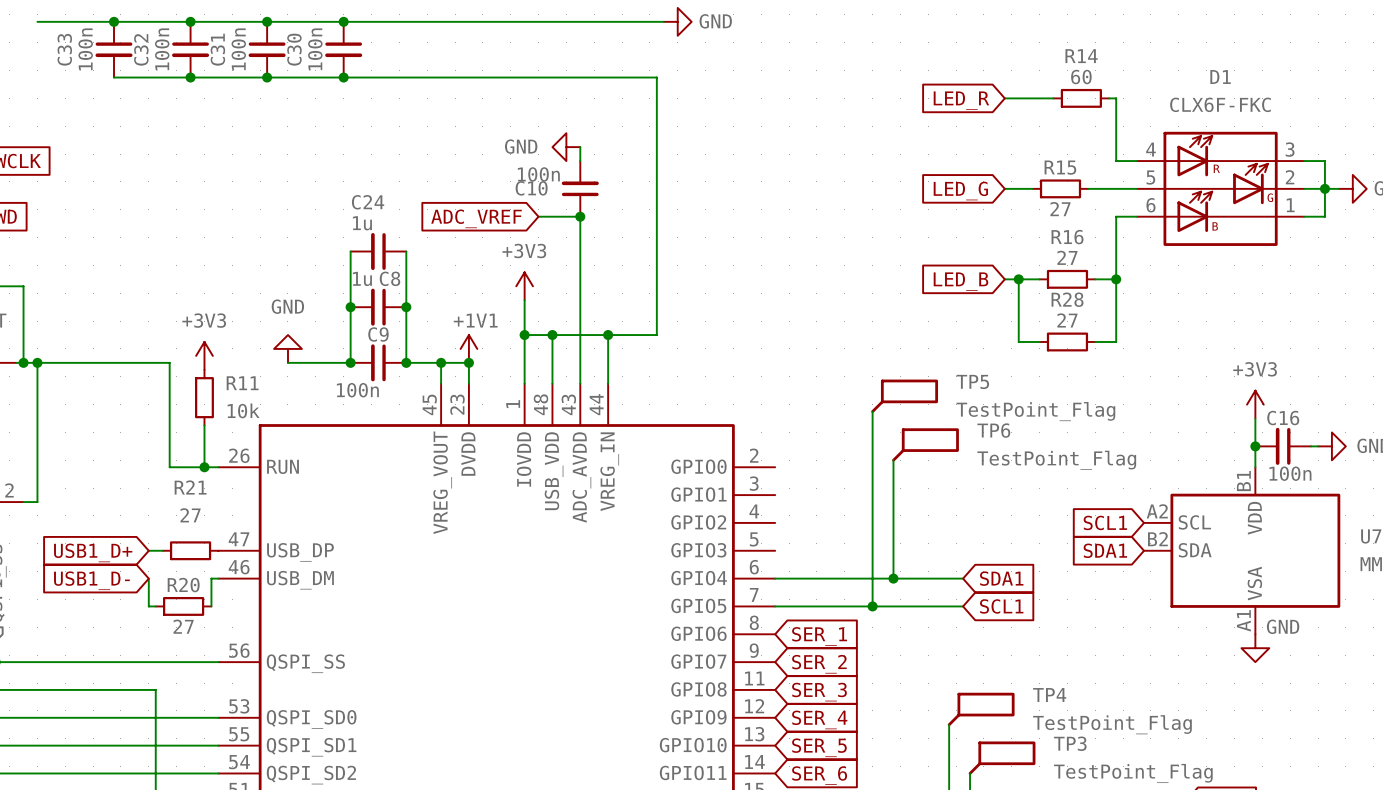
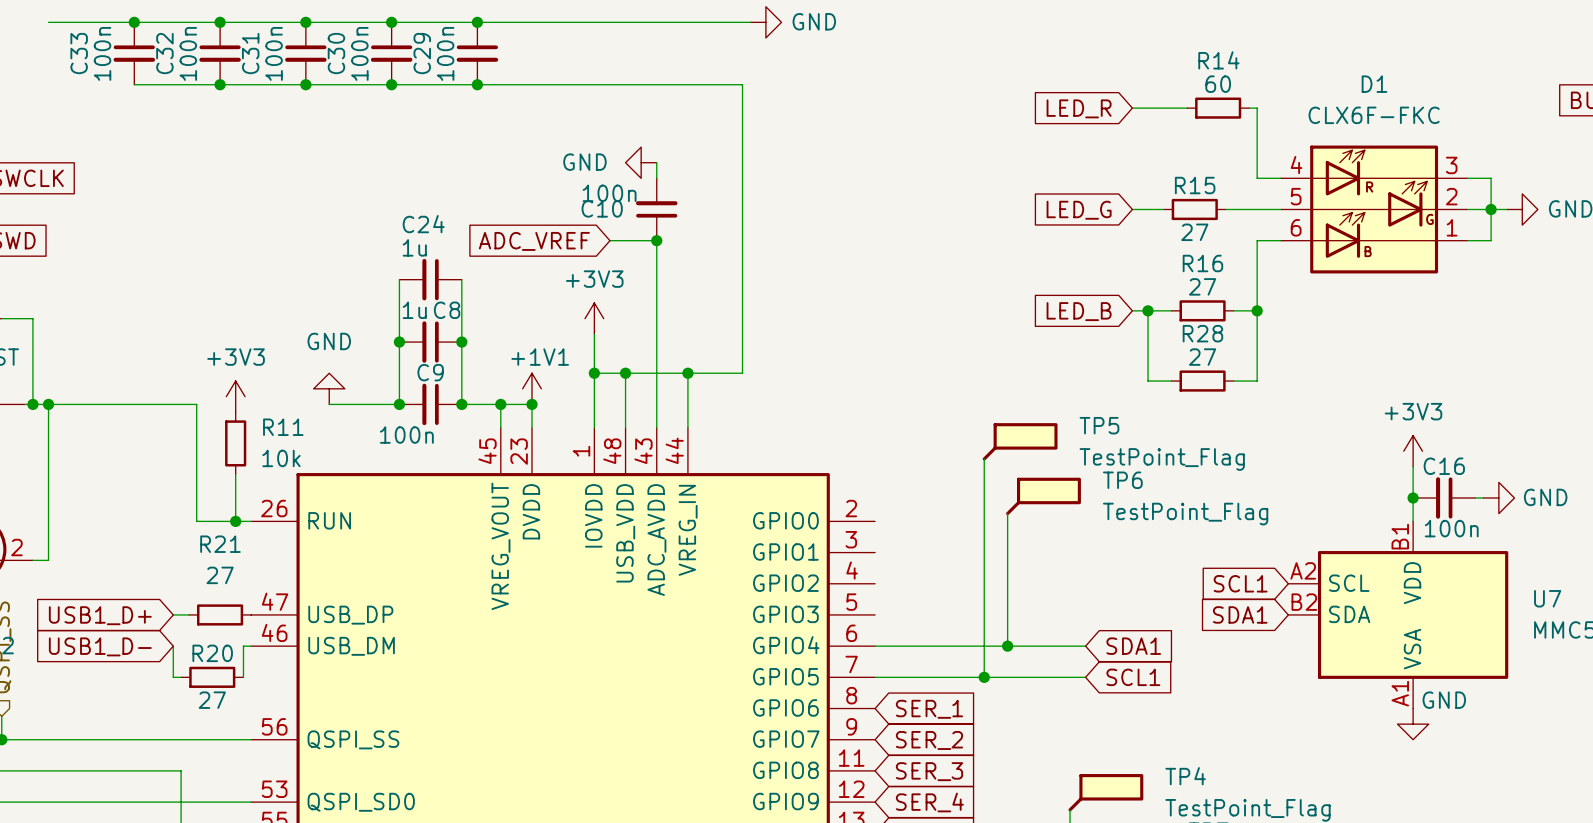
junction: none -> (477, 22)
C29: none -> 100n (477, 53)
junction: none -> (477, 84)

